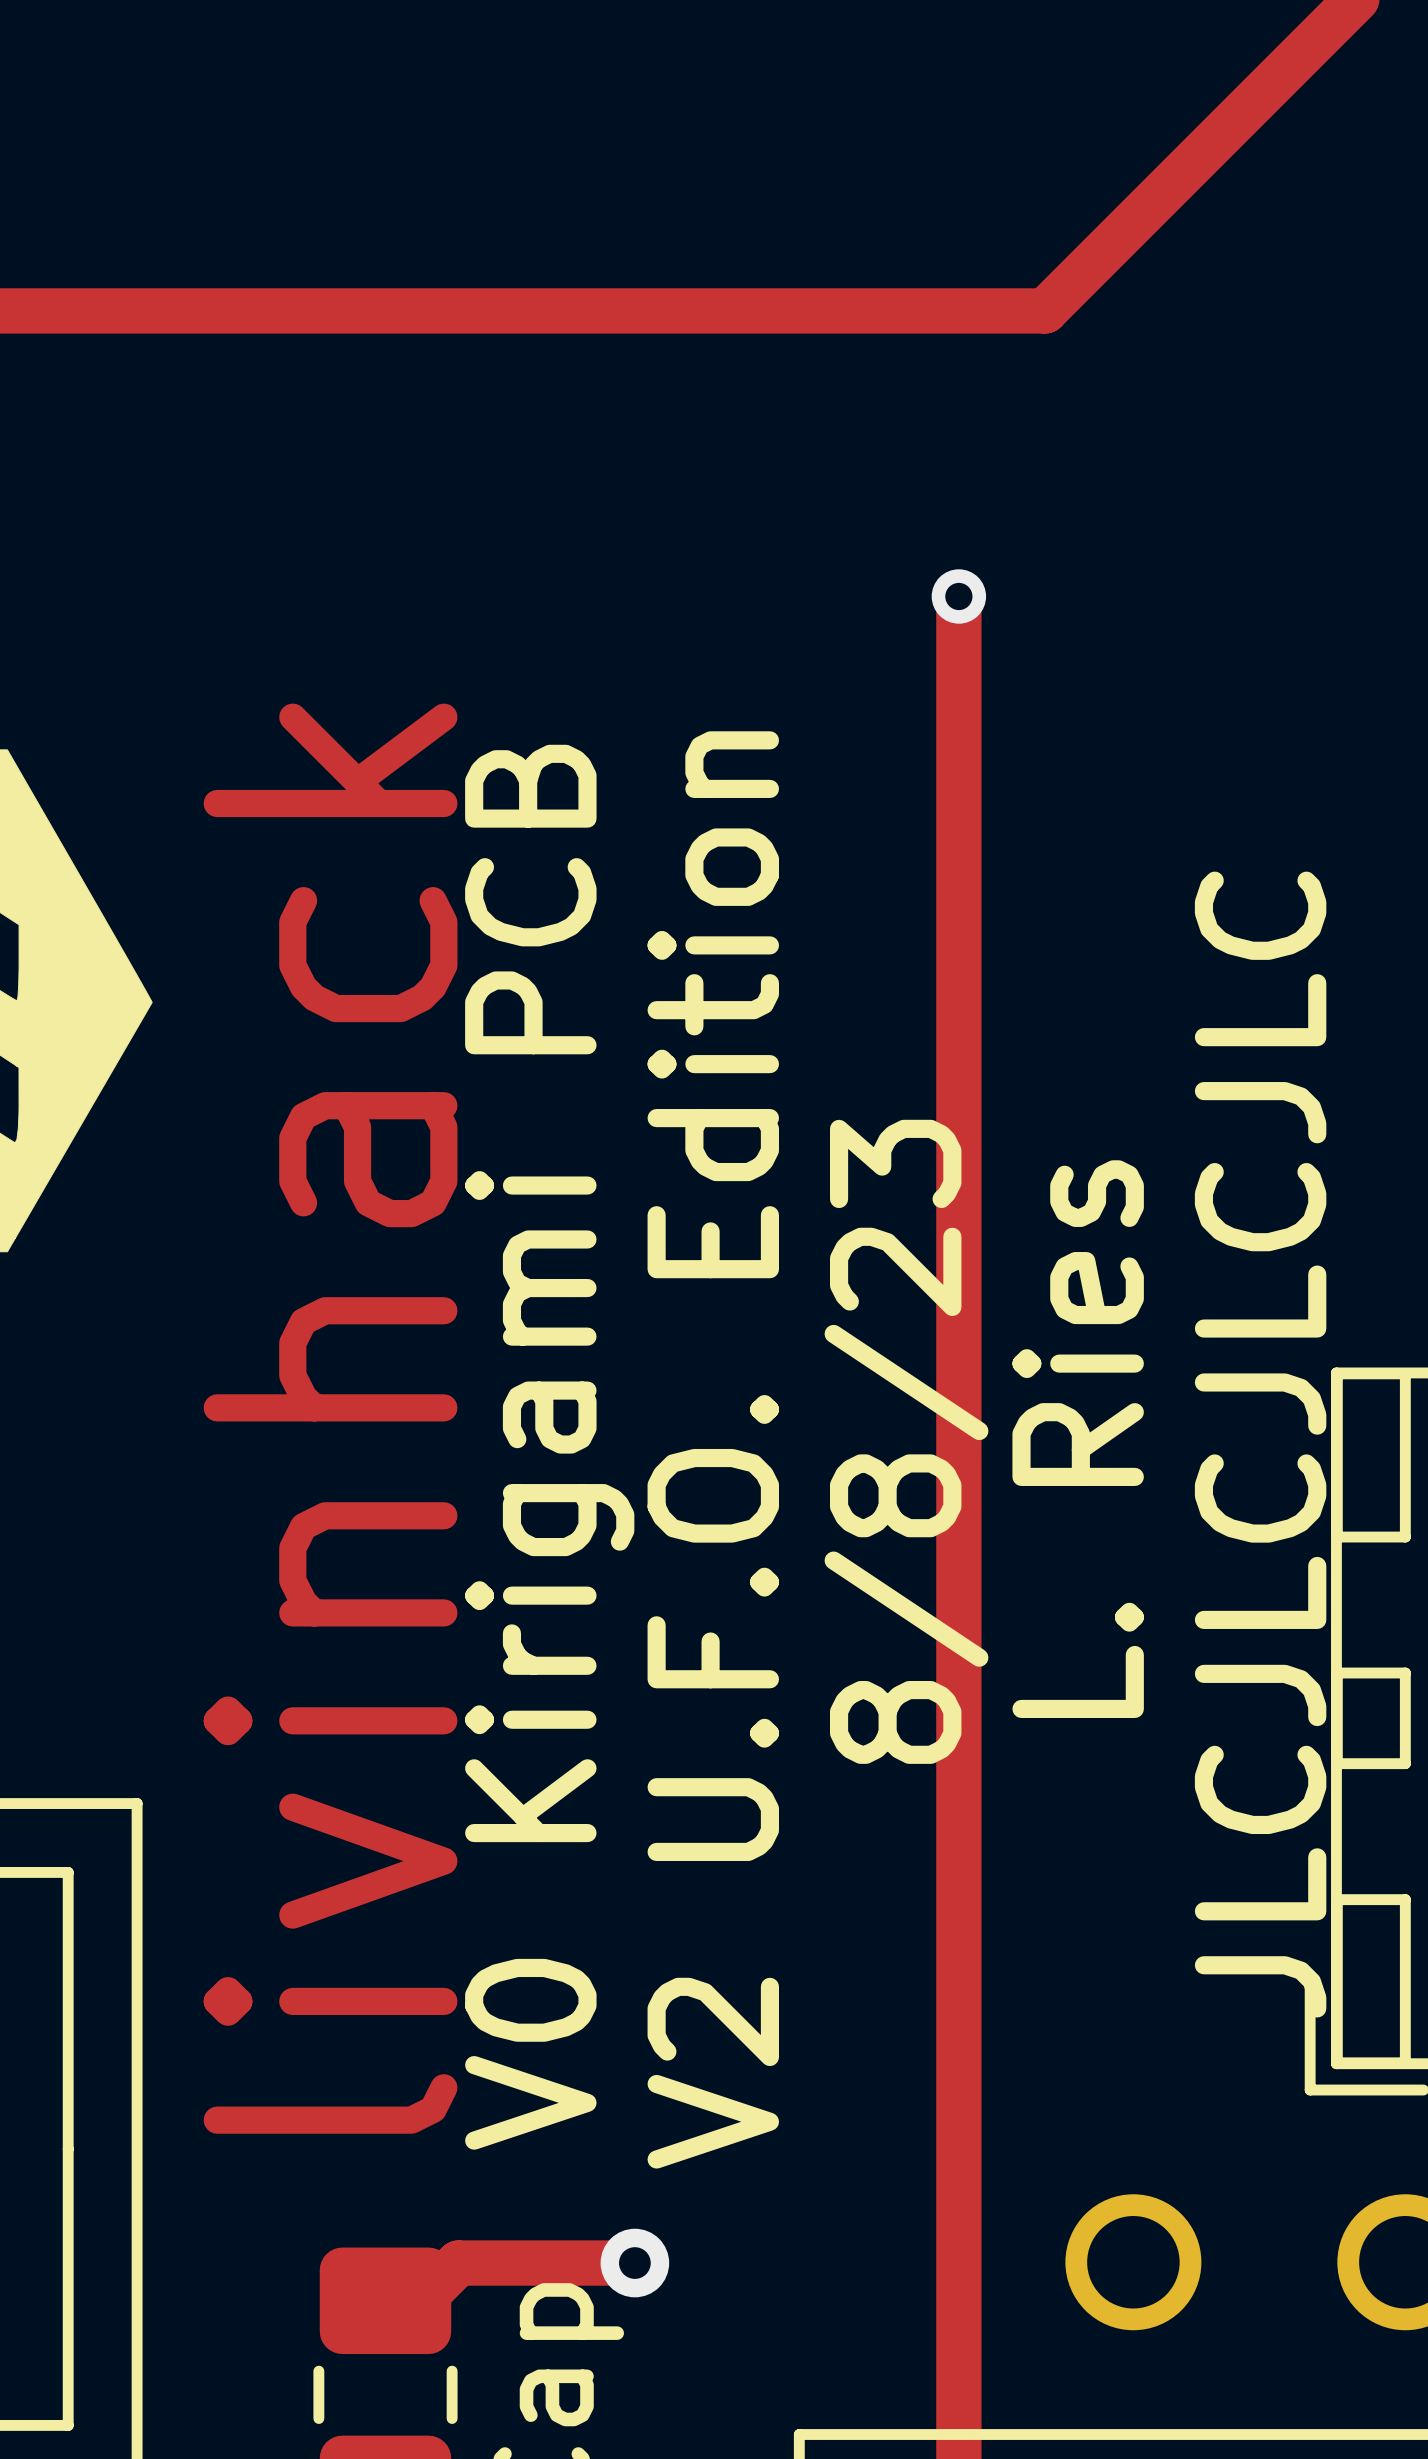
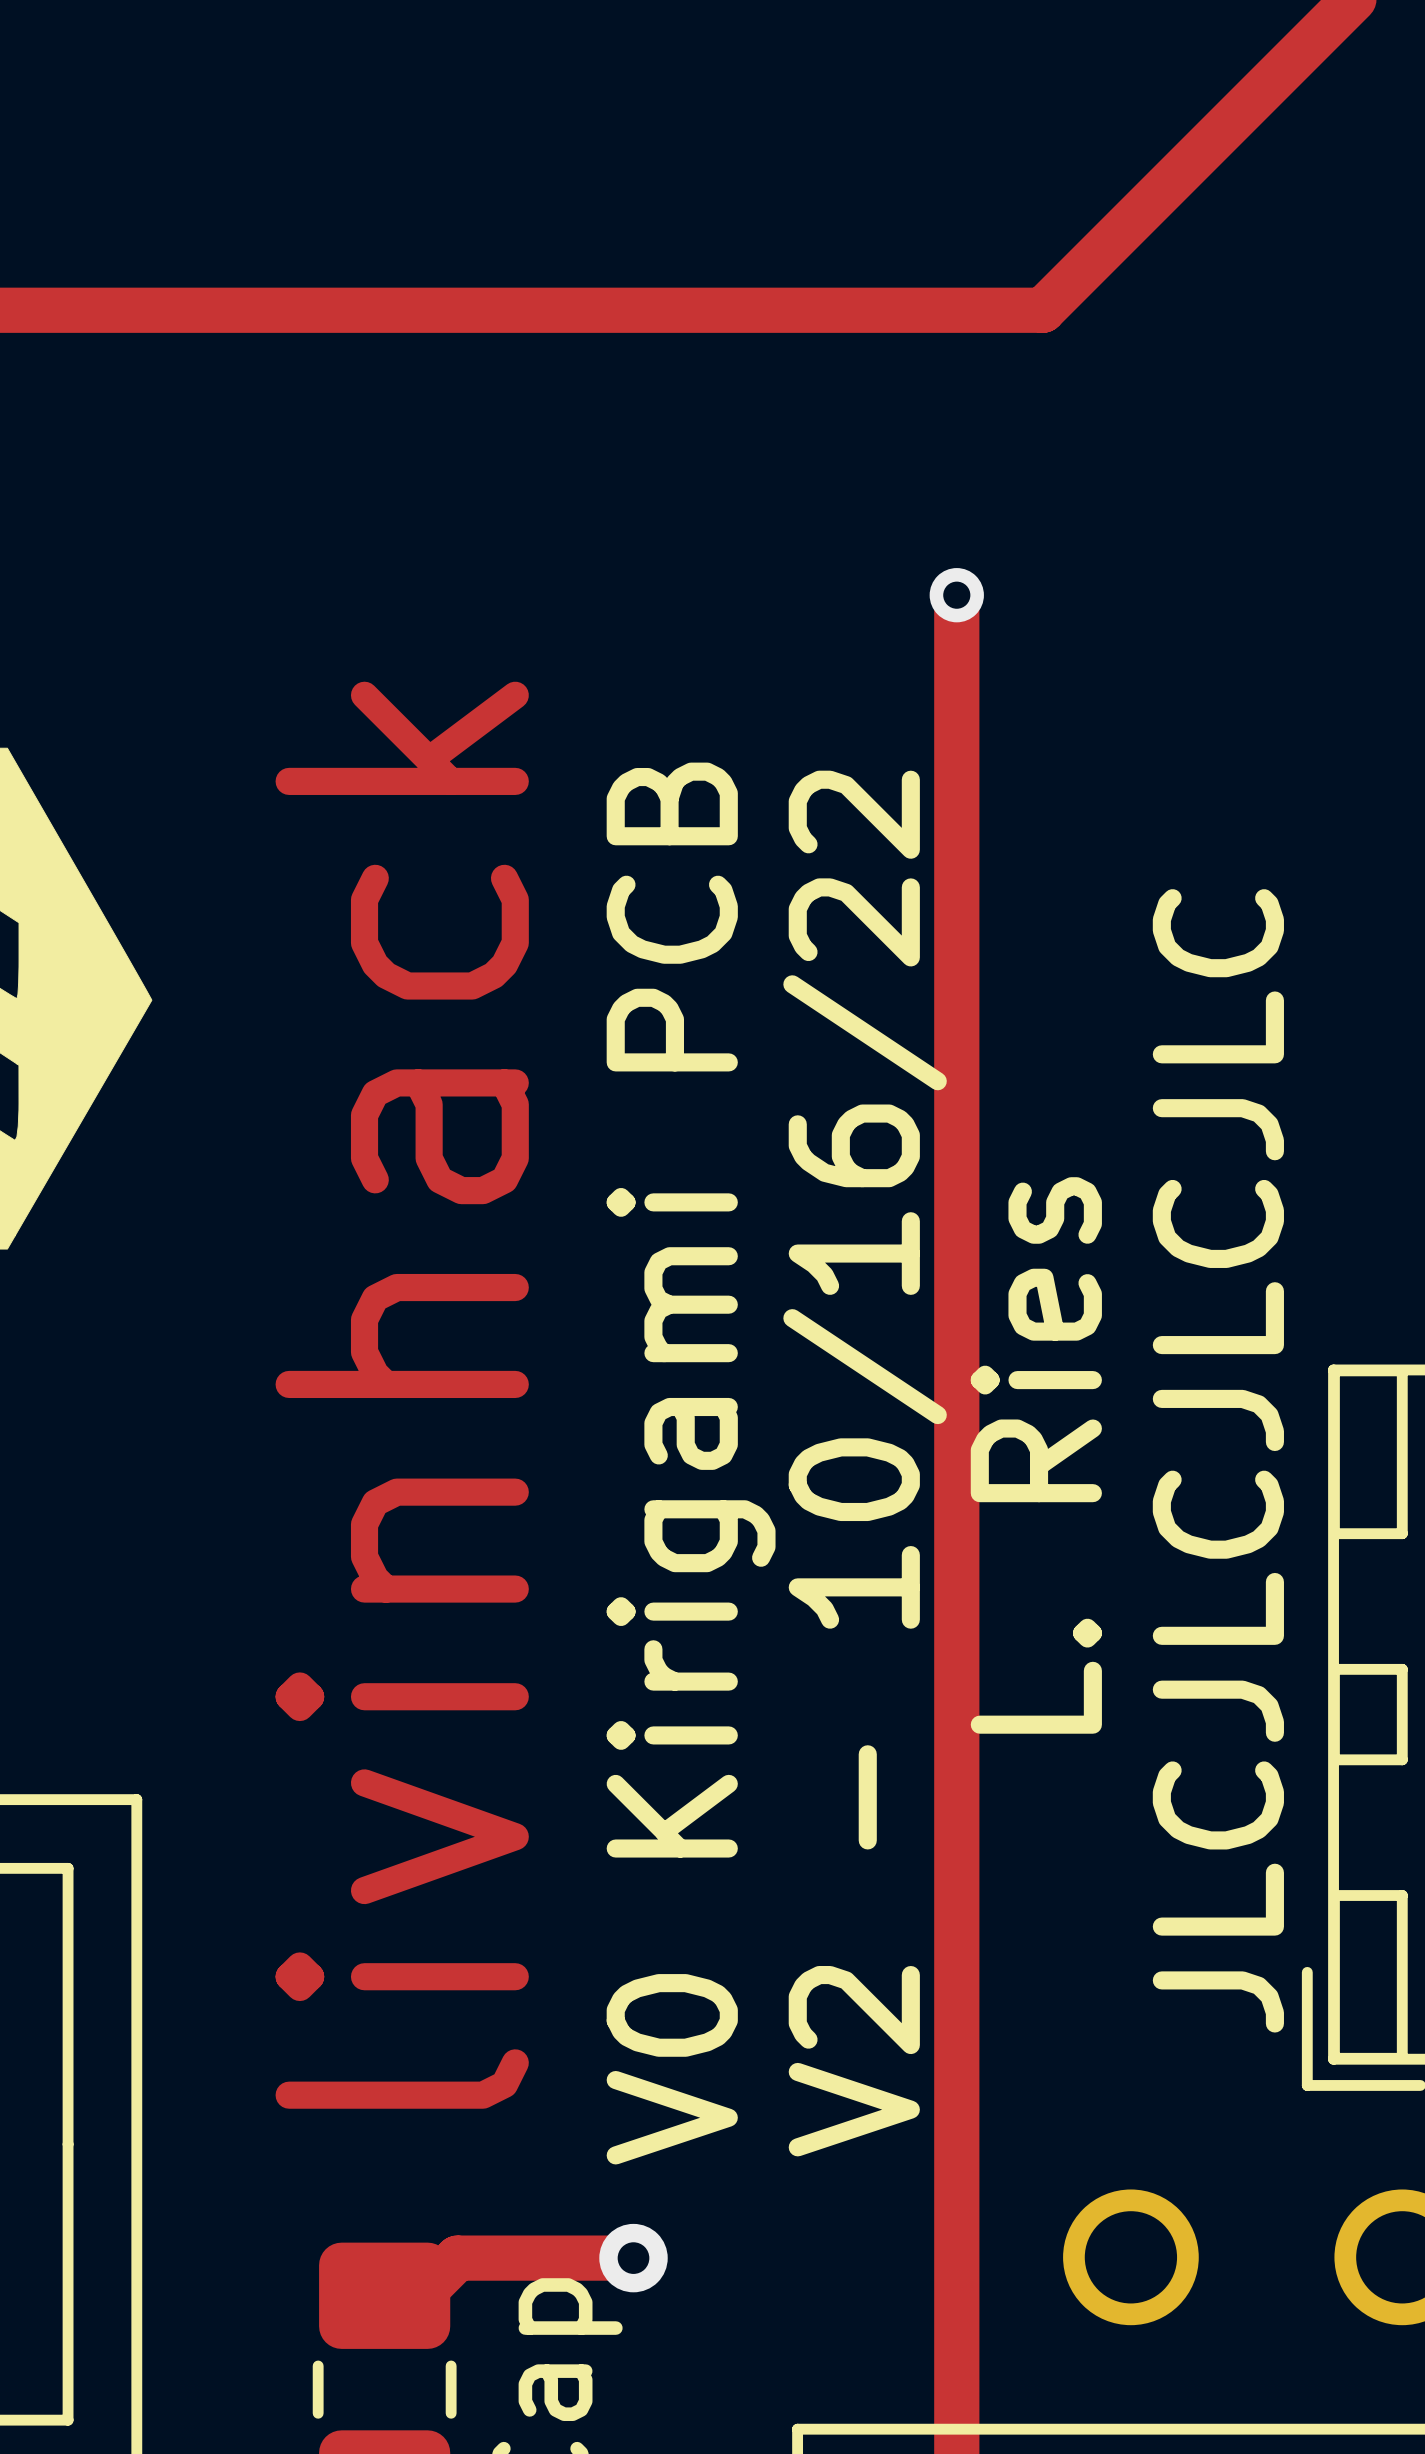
text position: livinhack (330, 1418) -> livinhack (402, 1395)
text position: L. Ries (1078, 1439) -> L. Ries (1036, 1455)
text: 8/8/23 (906, 1441) -> V2 - 10/16/22 (865, 1463)
text position: JLCJLCJLCJLC (1260, 1444) -> JLCJLCJLCJLC (1218, 1460)
text position: V0 Kirigami PCB (549, 1447) -> V0 Kirigami PCB (691, 1463)
text: V2 U.F.O. Edition (713, 1449) -> none

